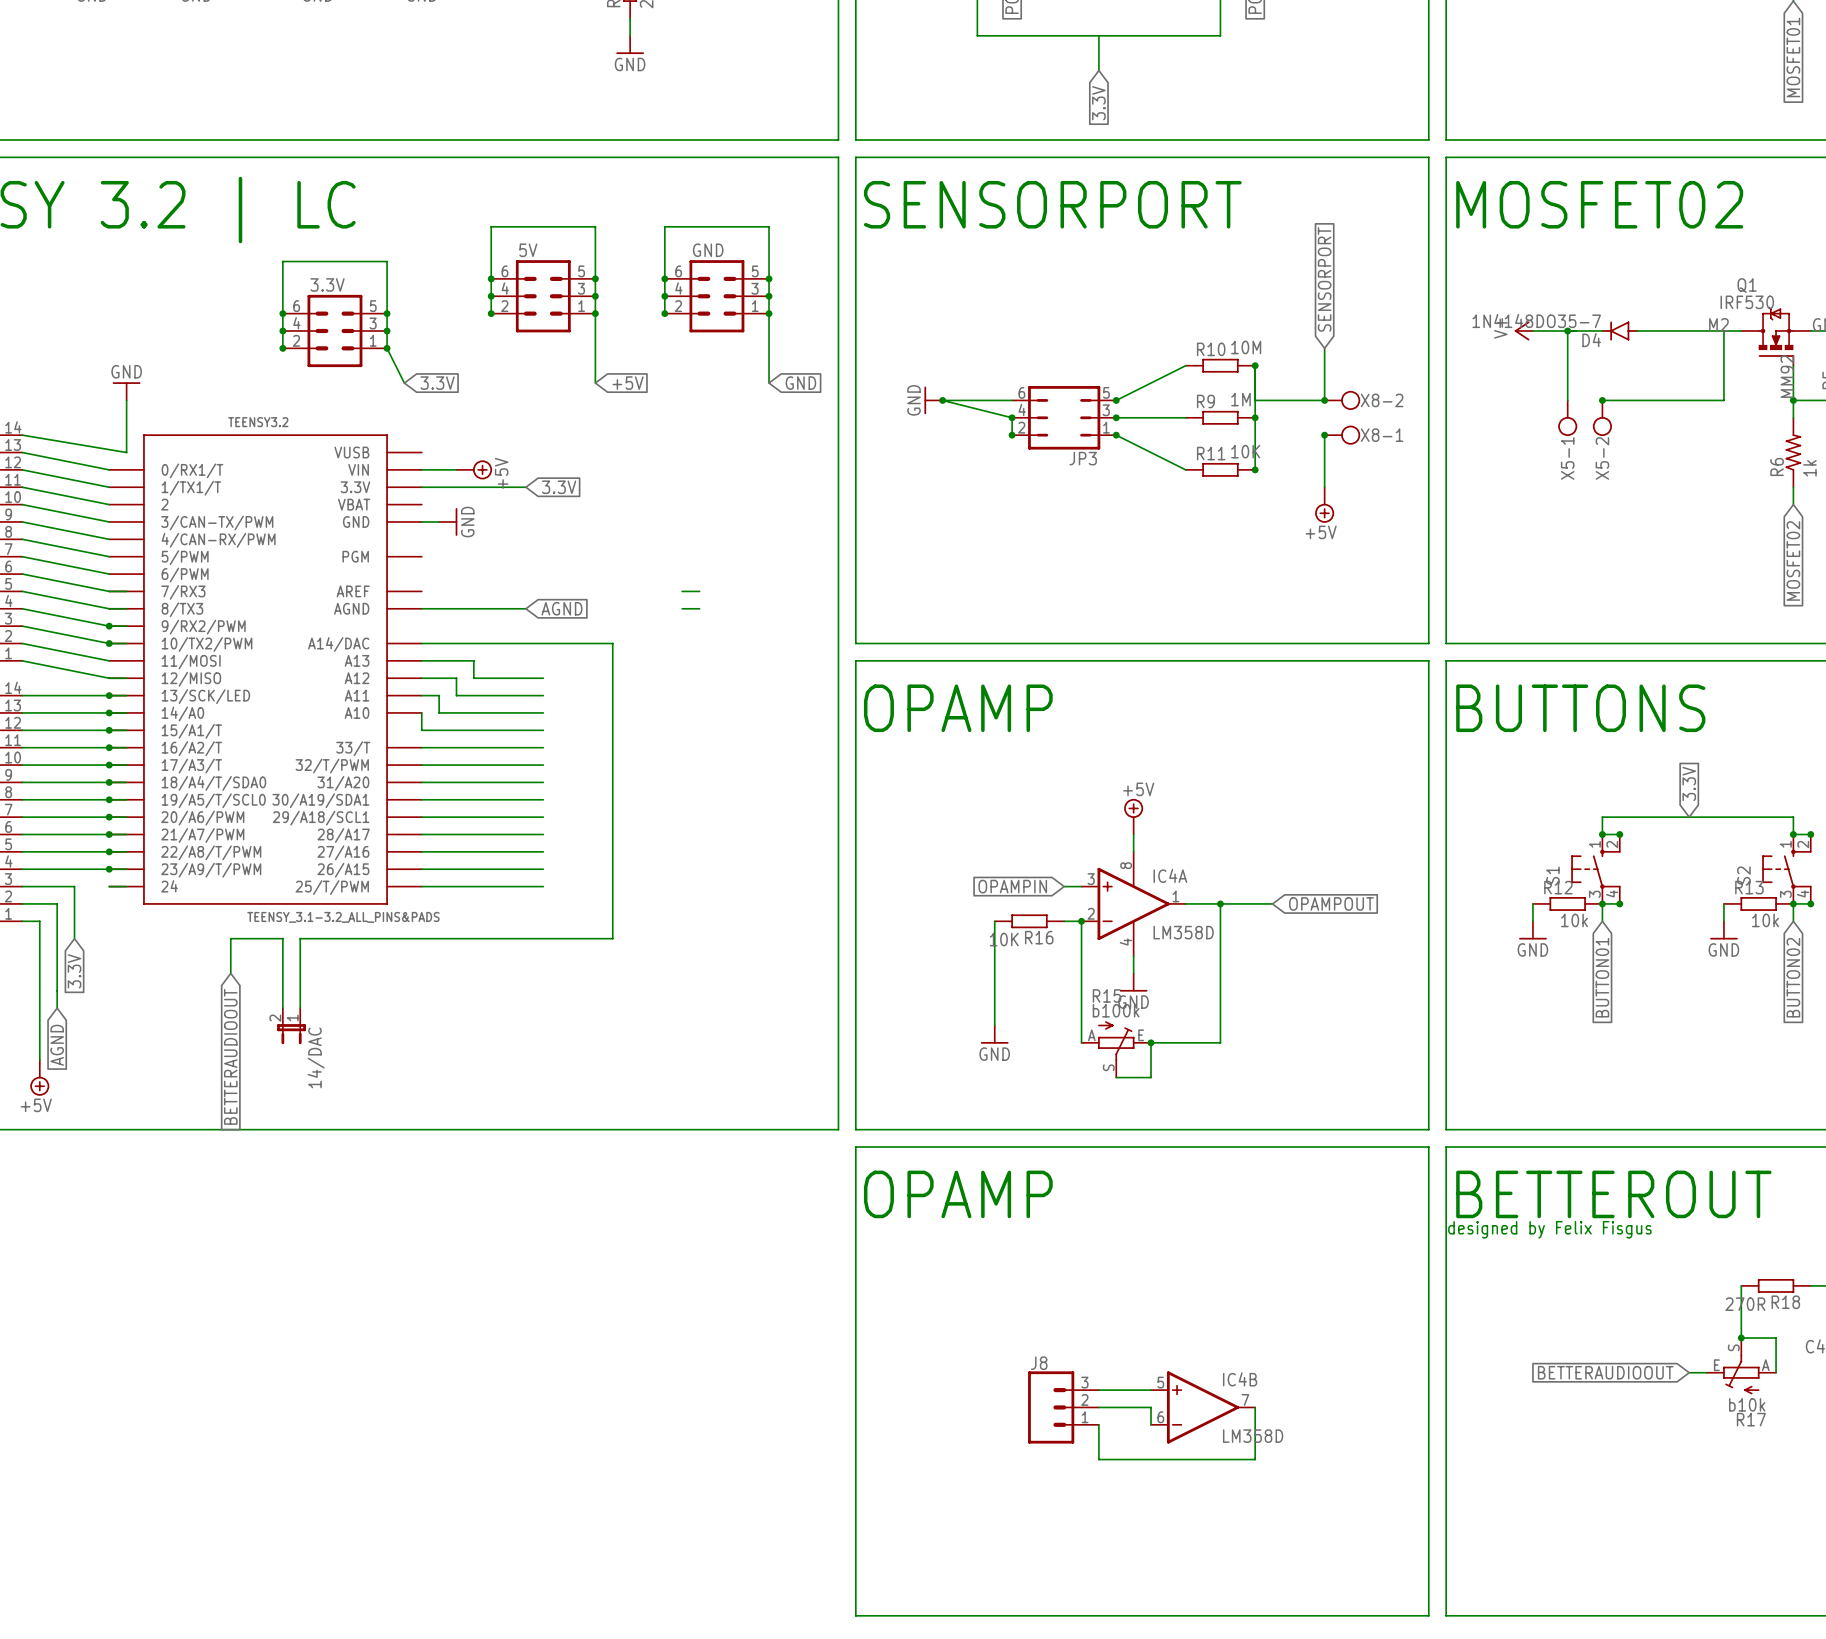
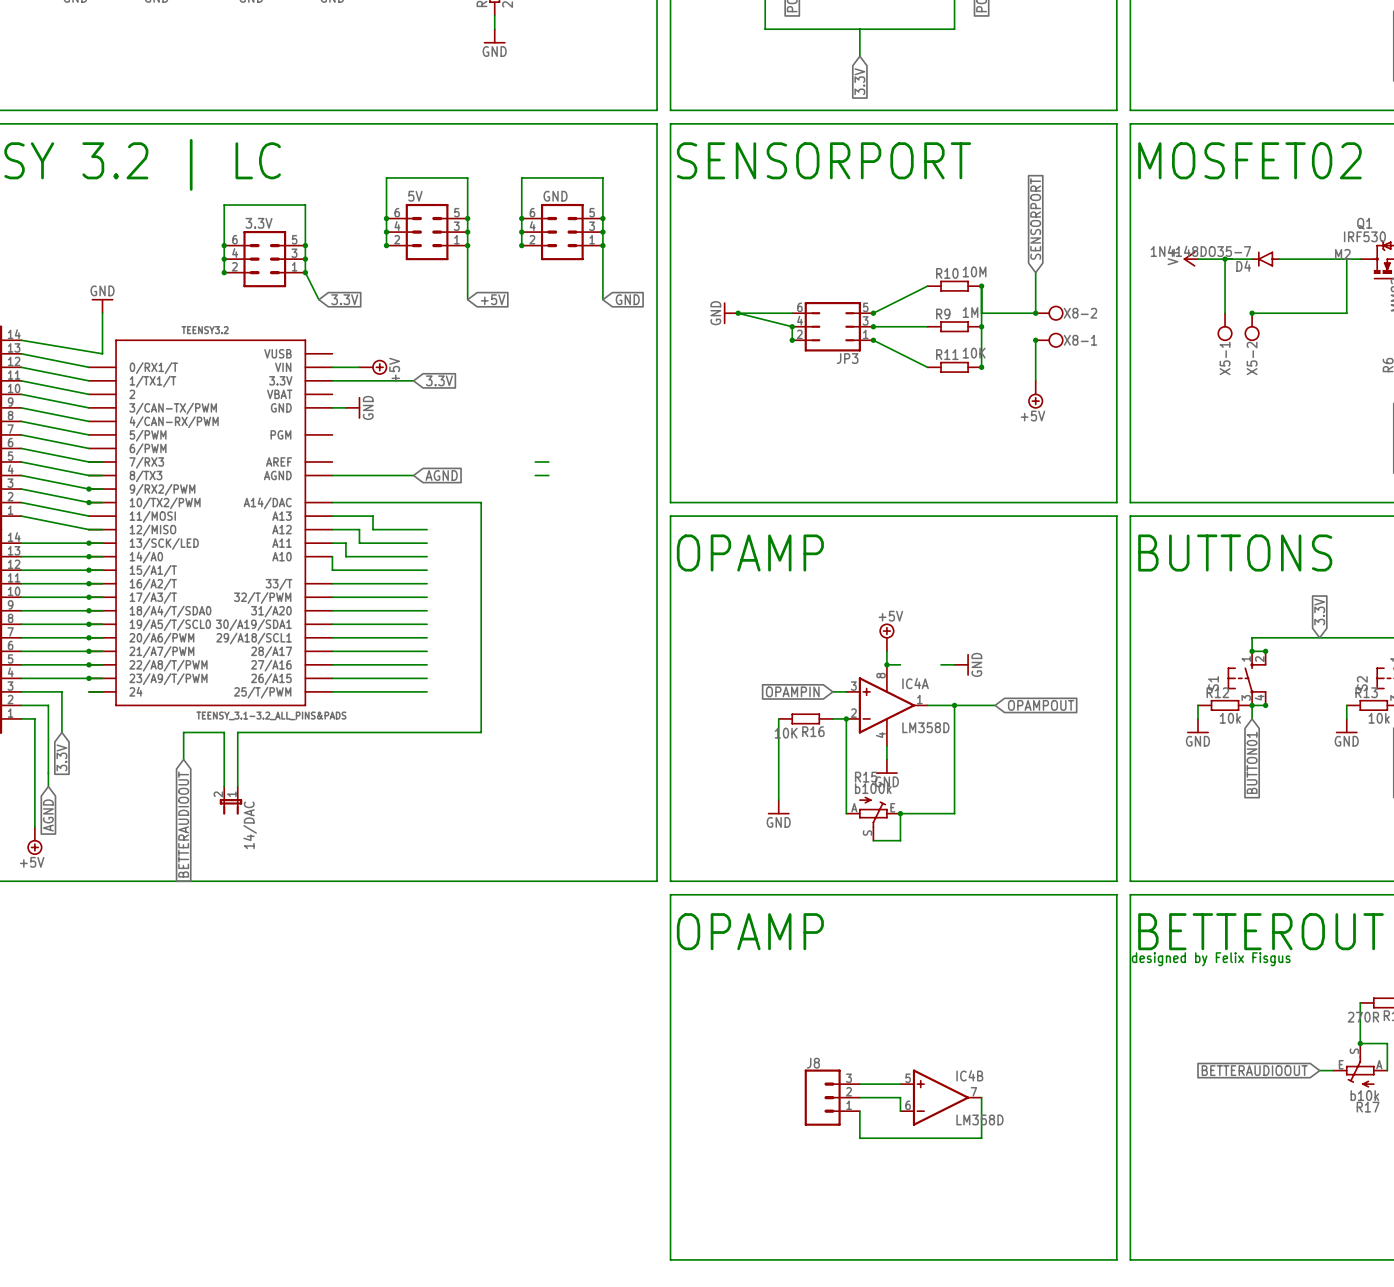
wire: none -> (886, 664) (900, 664)
junction: none -> (886, 664)
wire: none -> (941, 664) (954, 664)
power symbol: none -> GND (961, 664)

